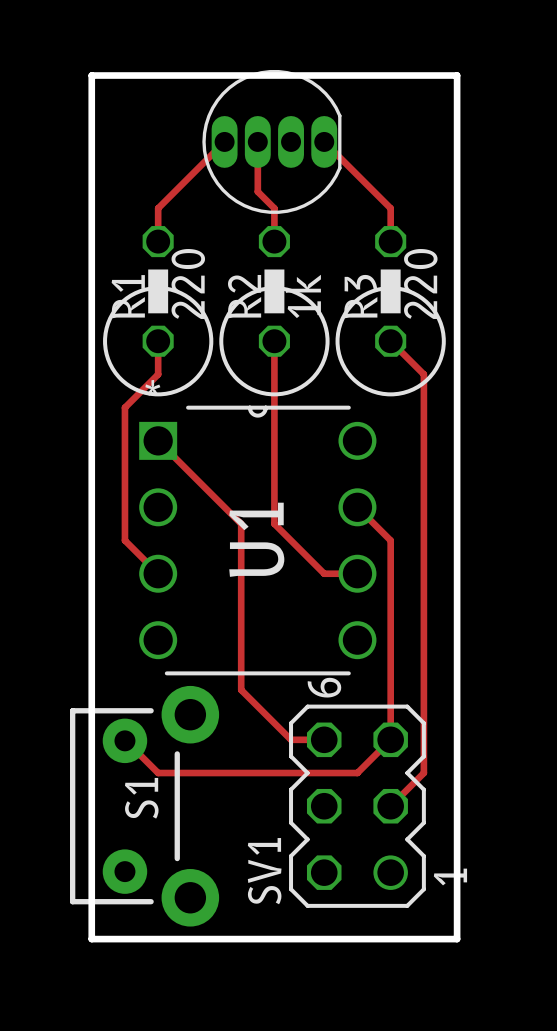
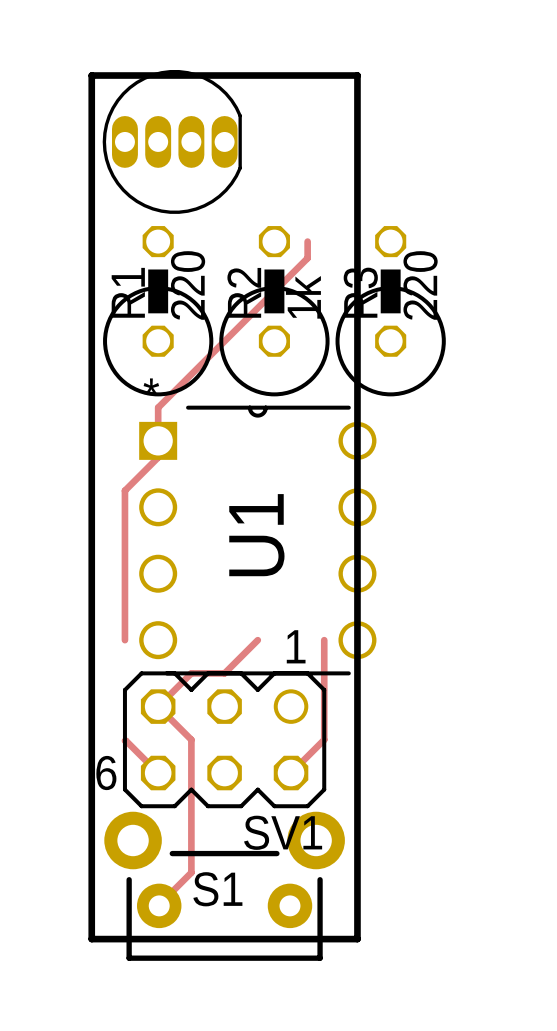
board edge: (357, 75) (457, 75) (457, 939) (357, 939) -> (357, 75) (357, 939)
track: (224, 141) (158, 208) (158, 241) -> none
track: (257, 141) (257, 191) (274, 208) (274, 241) -> none
part position: (271, 141) -> (172, 141)
track: (324, 141) (390, 208) (390, 241) -> none
track: (158, 341) (158, 374) (124, 407) (124, 490) -> (307, 241) (307, 258) (158, 407) (158, 457) (124, 490)
track: (274, 341) (274, 523) (324, 573) (357, 573) -> none
track: (390, 341) (423, 374) (423, 773) (390, 806) -> none
track: (158, 440) (241, 523) (241, 689) (291, 739) (324, 739) -> none
track: (357, 507) (390, 540) (390, 739) (357, 773) (158, 773) -> none
track: (124, 540) (158, 573) -> (124, 540) (124, 640)
track: none -> (257, 640) (224, 673) (191, 673) (158, 706) (191, 739) (191, 872) (159, 905)
track: none -> (324, 640) (324, 739) (291, 773)
SV1 footprint: [289, 704, 426, 908] -> [122, 671, 327, 809]
S1 rotation: 0° (144, 806) -> 90° counterclockwise (224, 886)
SV1 name position: SV1 (264, 871) -> SV1 (283, 832)

